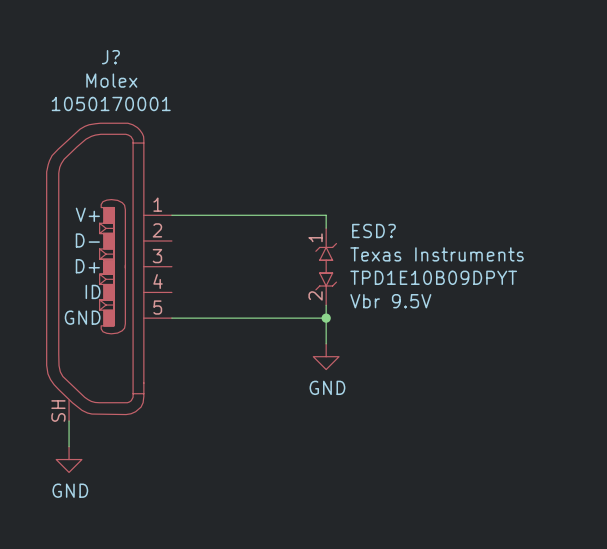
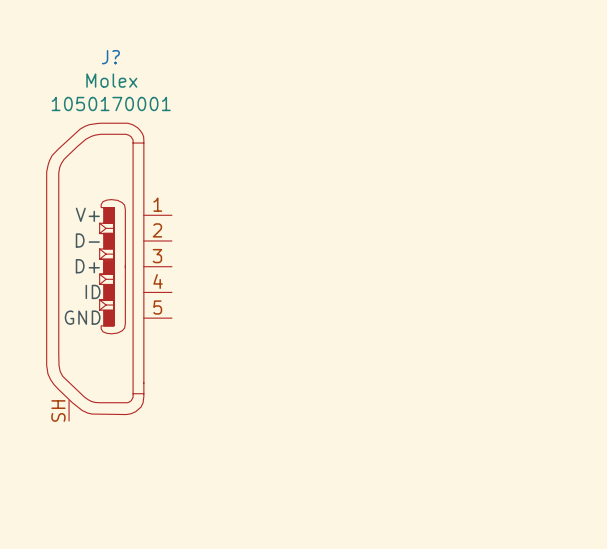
wire: (171, 215) (326, 215) (326, 228) -> none
ESD?: (326, 266) -> none
wire: (326, 305) (326, 343) -> none
wire: (171, 318) (326, 318) -> none
junction: (326, 318) -> none
power symbol: GND (326, 356) -> none
wire: (69, 420) (69, 446) -> none
power symbol: GND (69, 459) -> none

